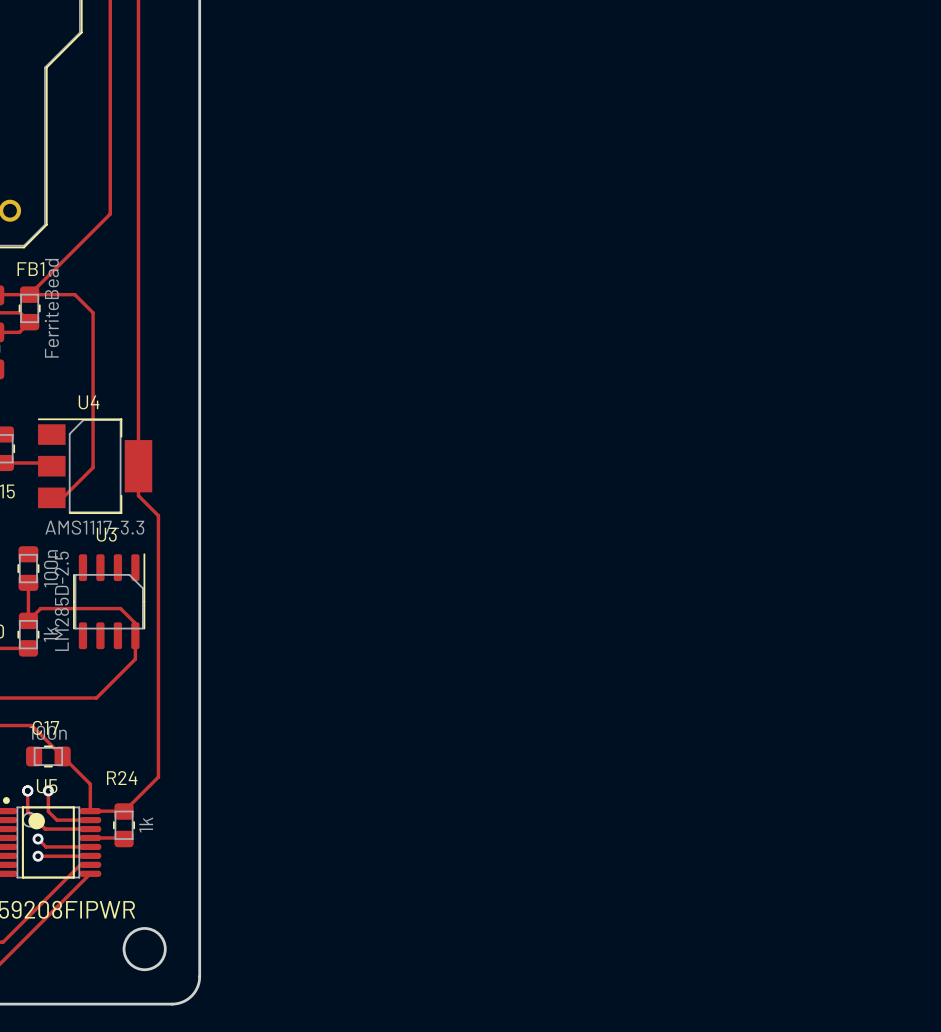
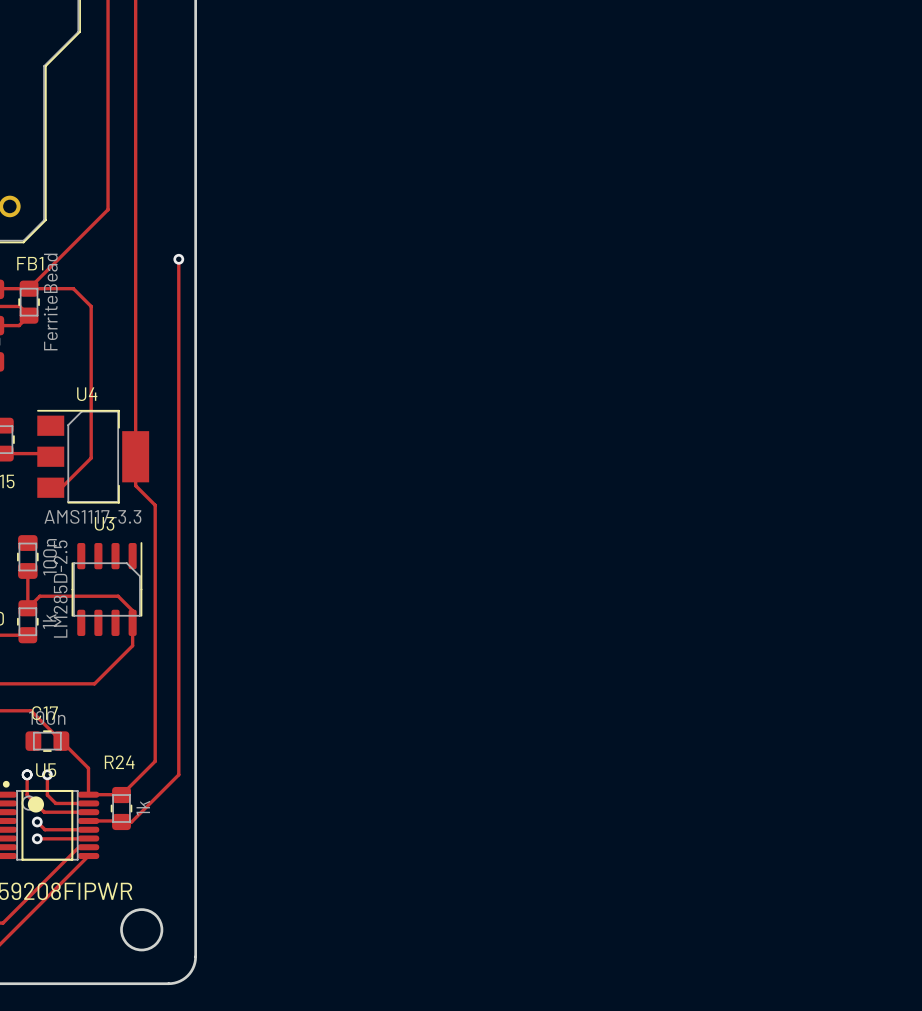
track: none -> (178, 259) (178, 774) (131, 821) (121, 821)
via: none -> (178, 259)

